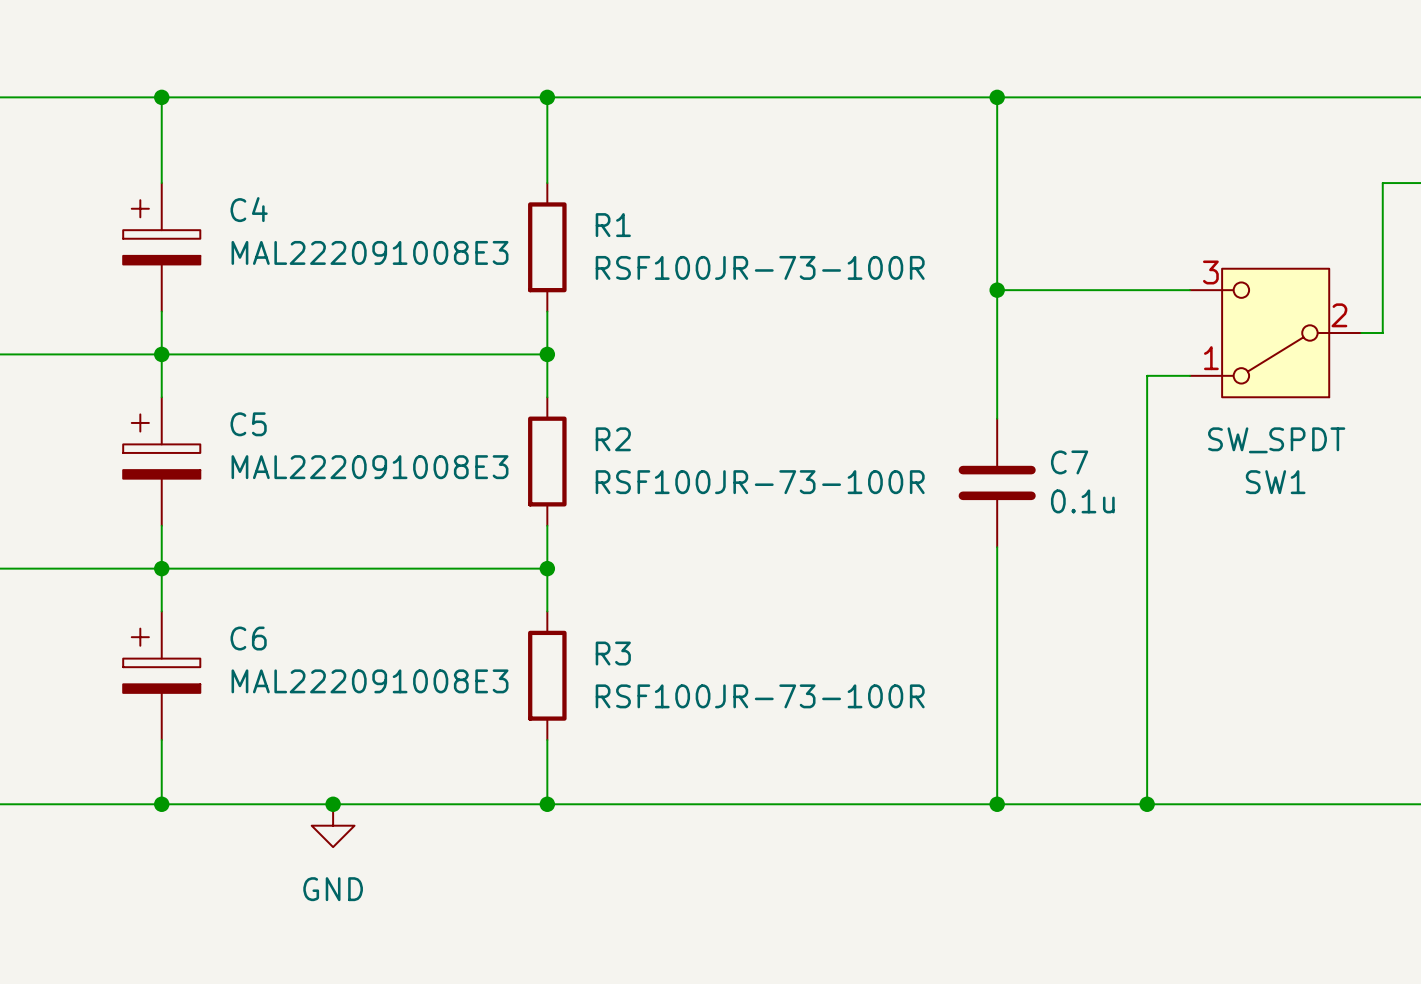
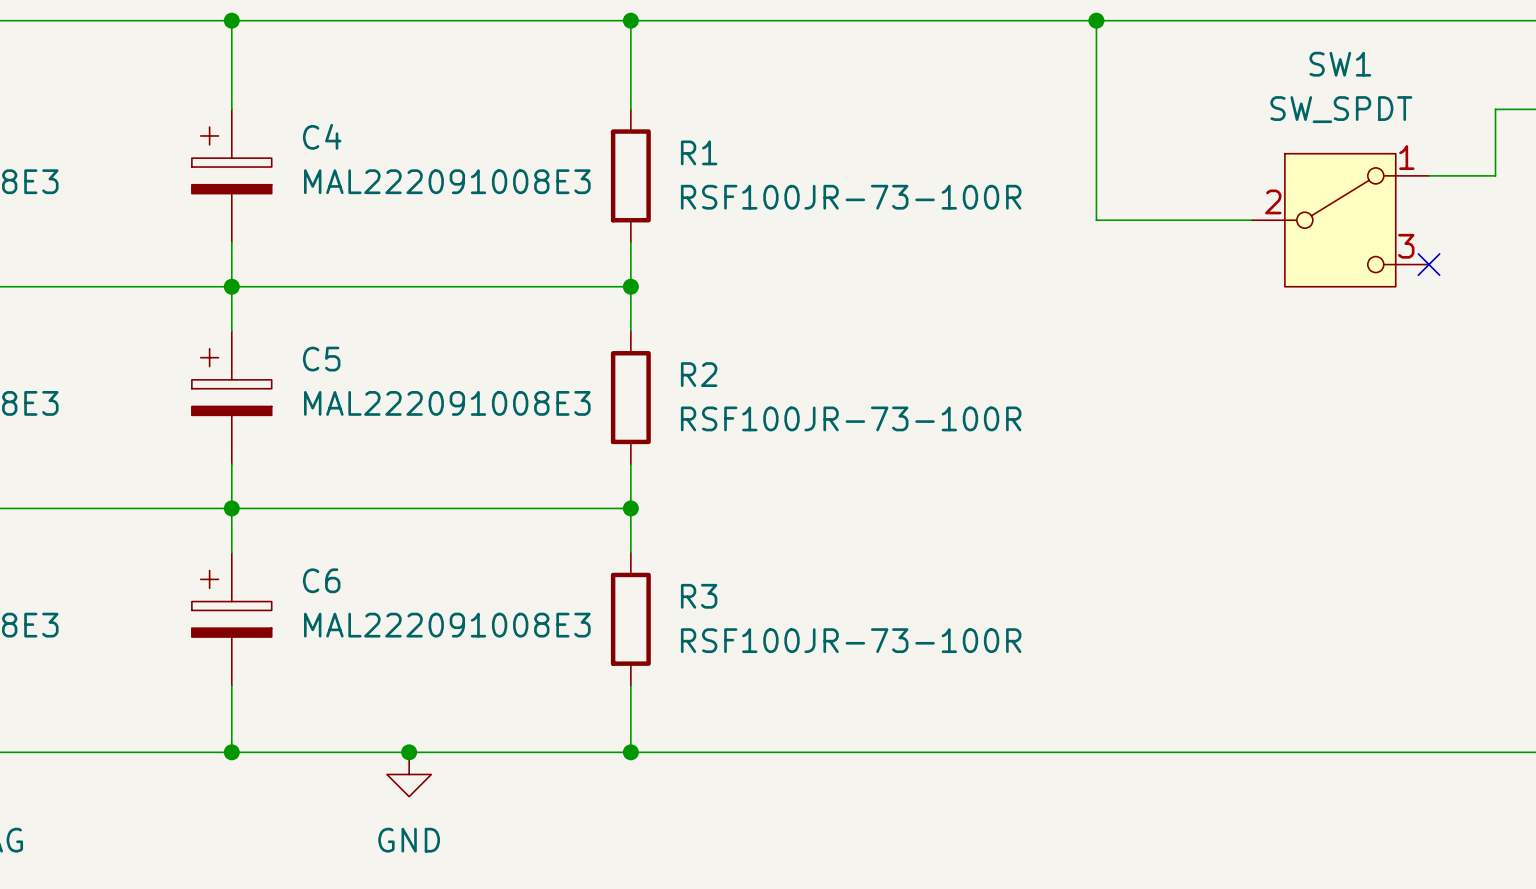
wire: (1382, 247) (1382, 333) (1361, 333) -> (1495, 175) (1429, 175)
wire: (997, 290) (997, 418) -> none
junction: (997, 290) -> none
SW1 rotation: 0° (1275, 333) -> 180° (1340, 220)
no-connect mark: none -> (1429, 264)
wire: (1189, 375) (1147, 375) (1147, 804) -> none
C7: 0.1u (997, 482) -> none
wire: (997, 547) (997, 804) -> none
junction: (997, 804) -> none
junction: (1147, 804) -> none

